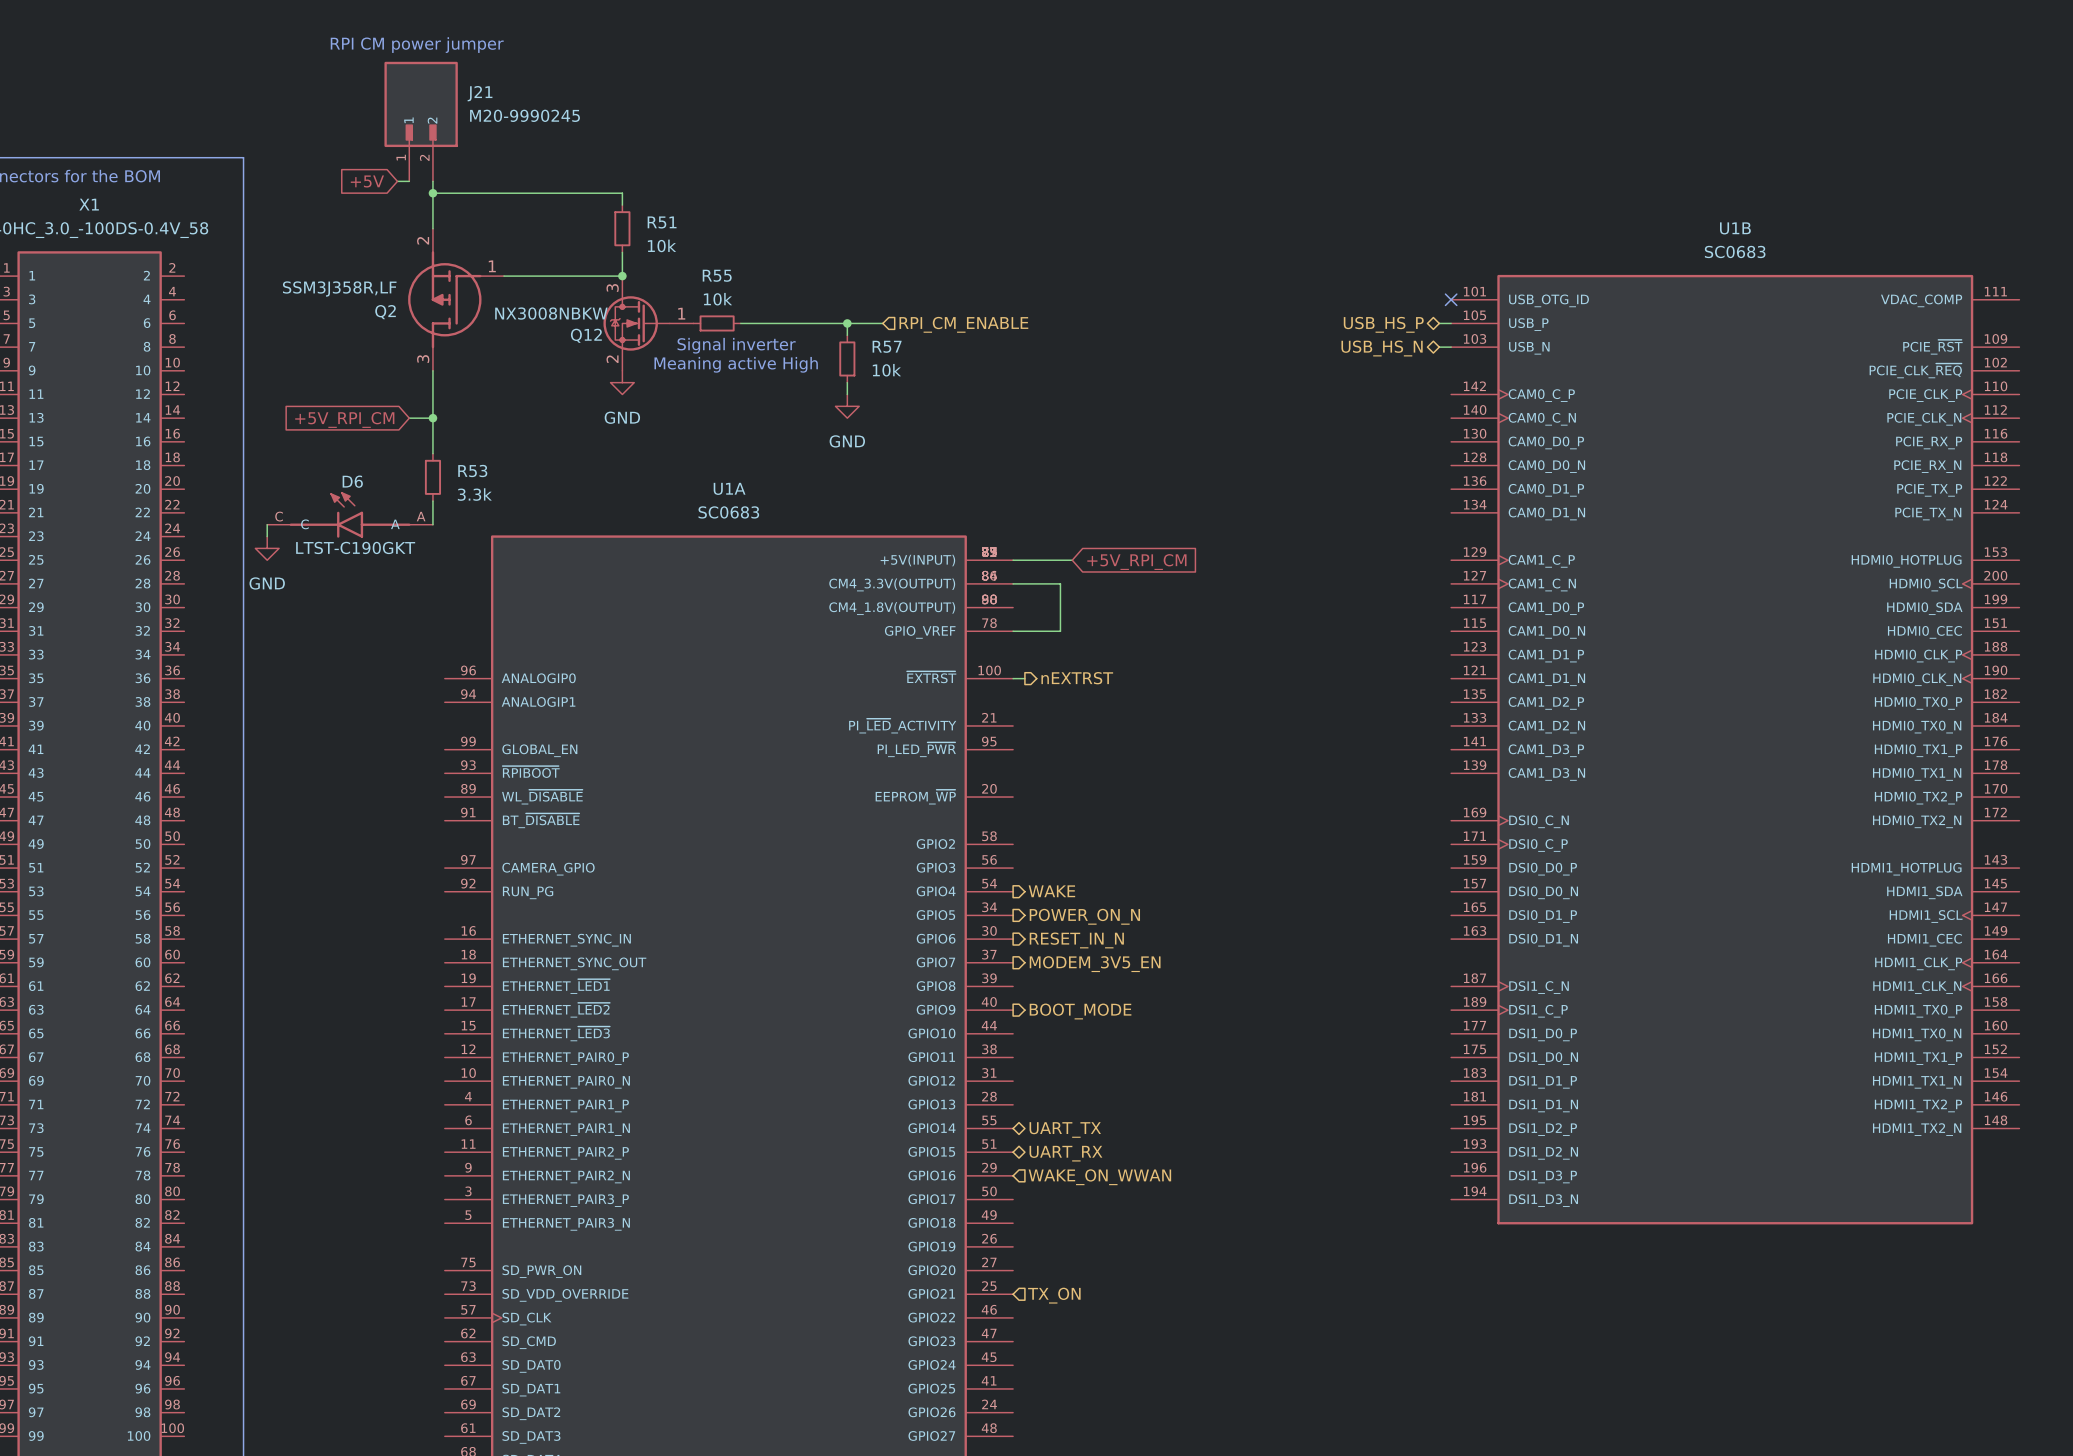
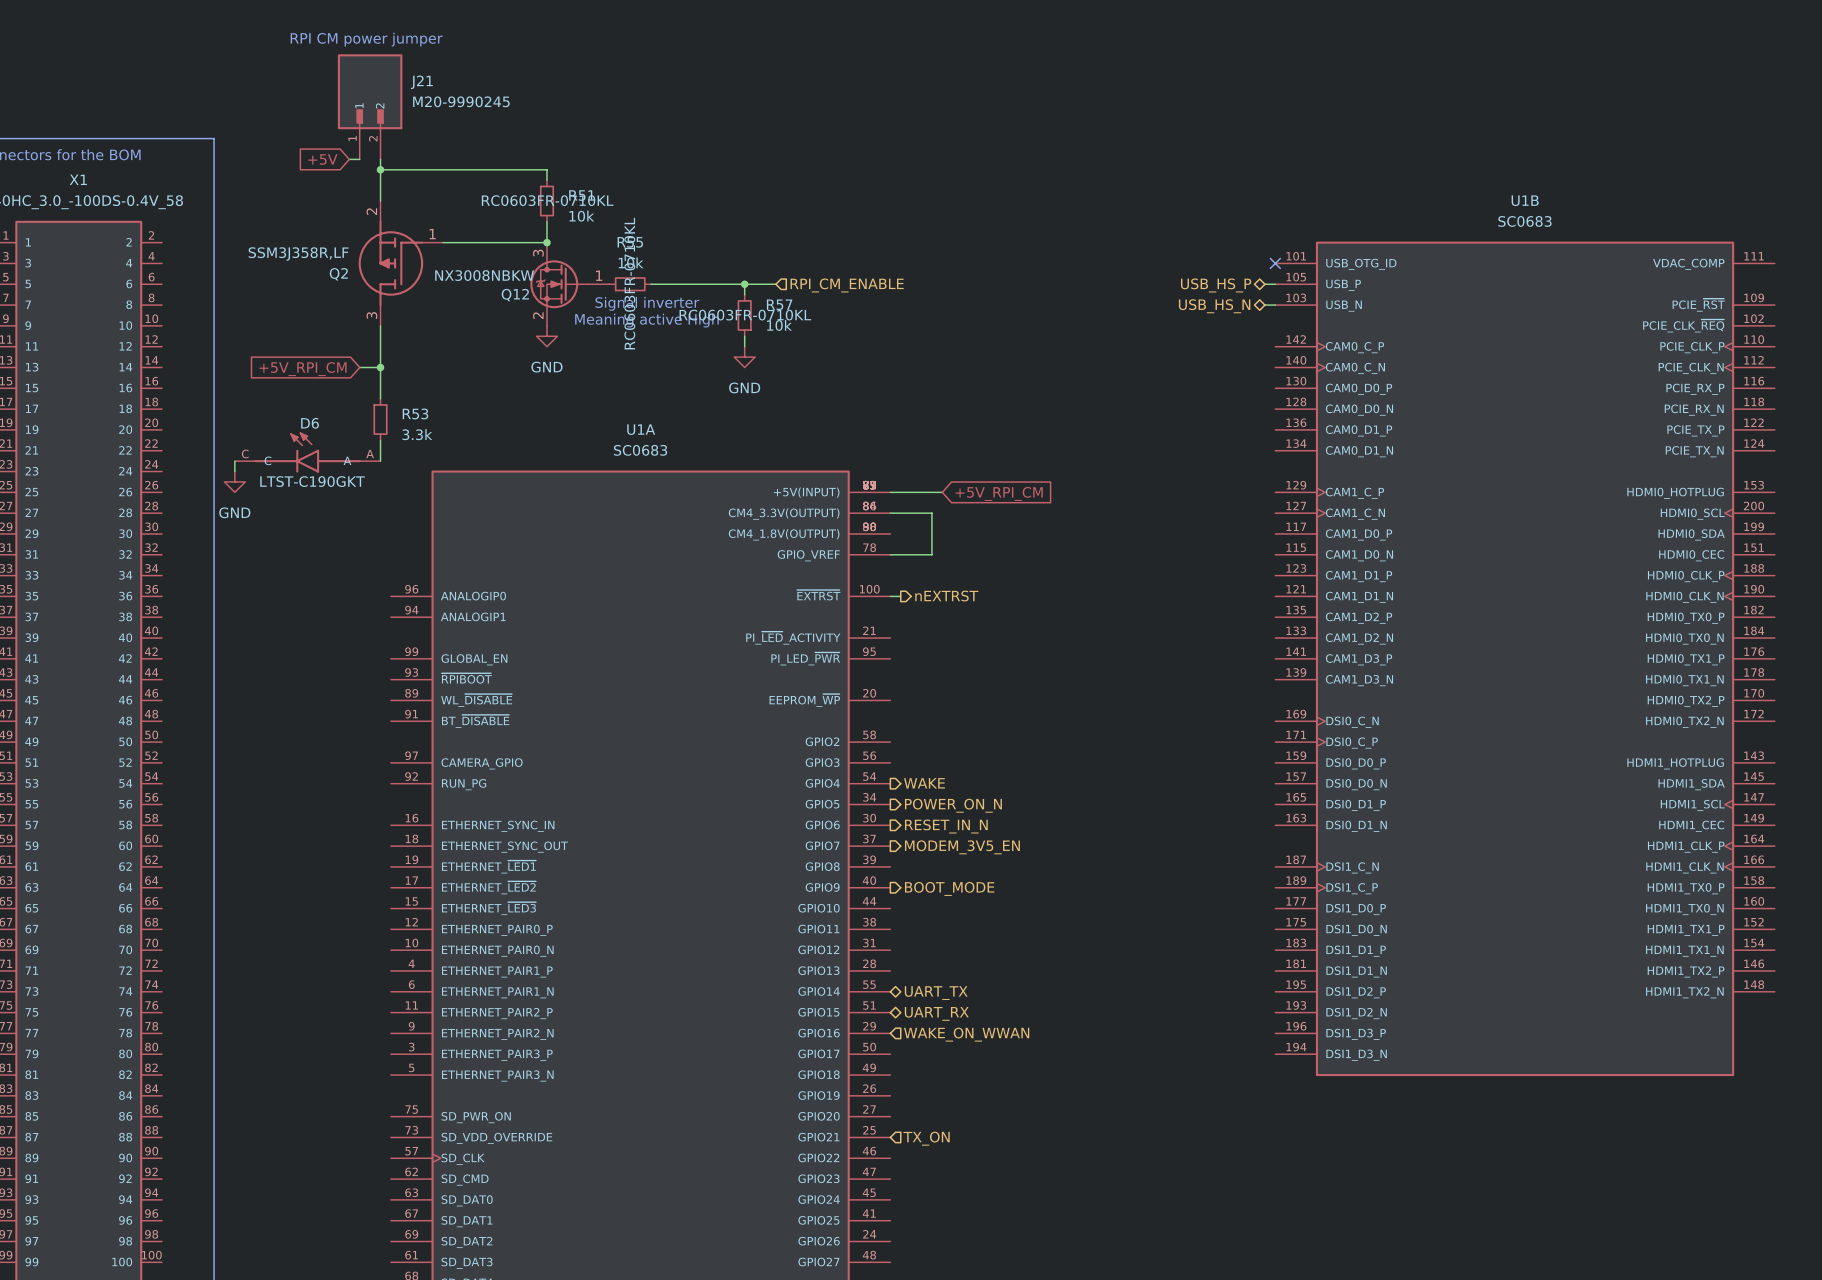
R51 text: none -> RC0603FR-0710KL (547, 200)
R55 text: none -> RC0603FR-0710KL (629, 283)
R57 text: none -> RC0603FR-0710KL (745, 315)

